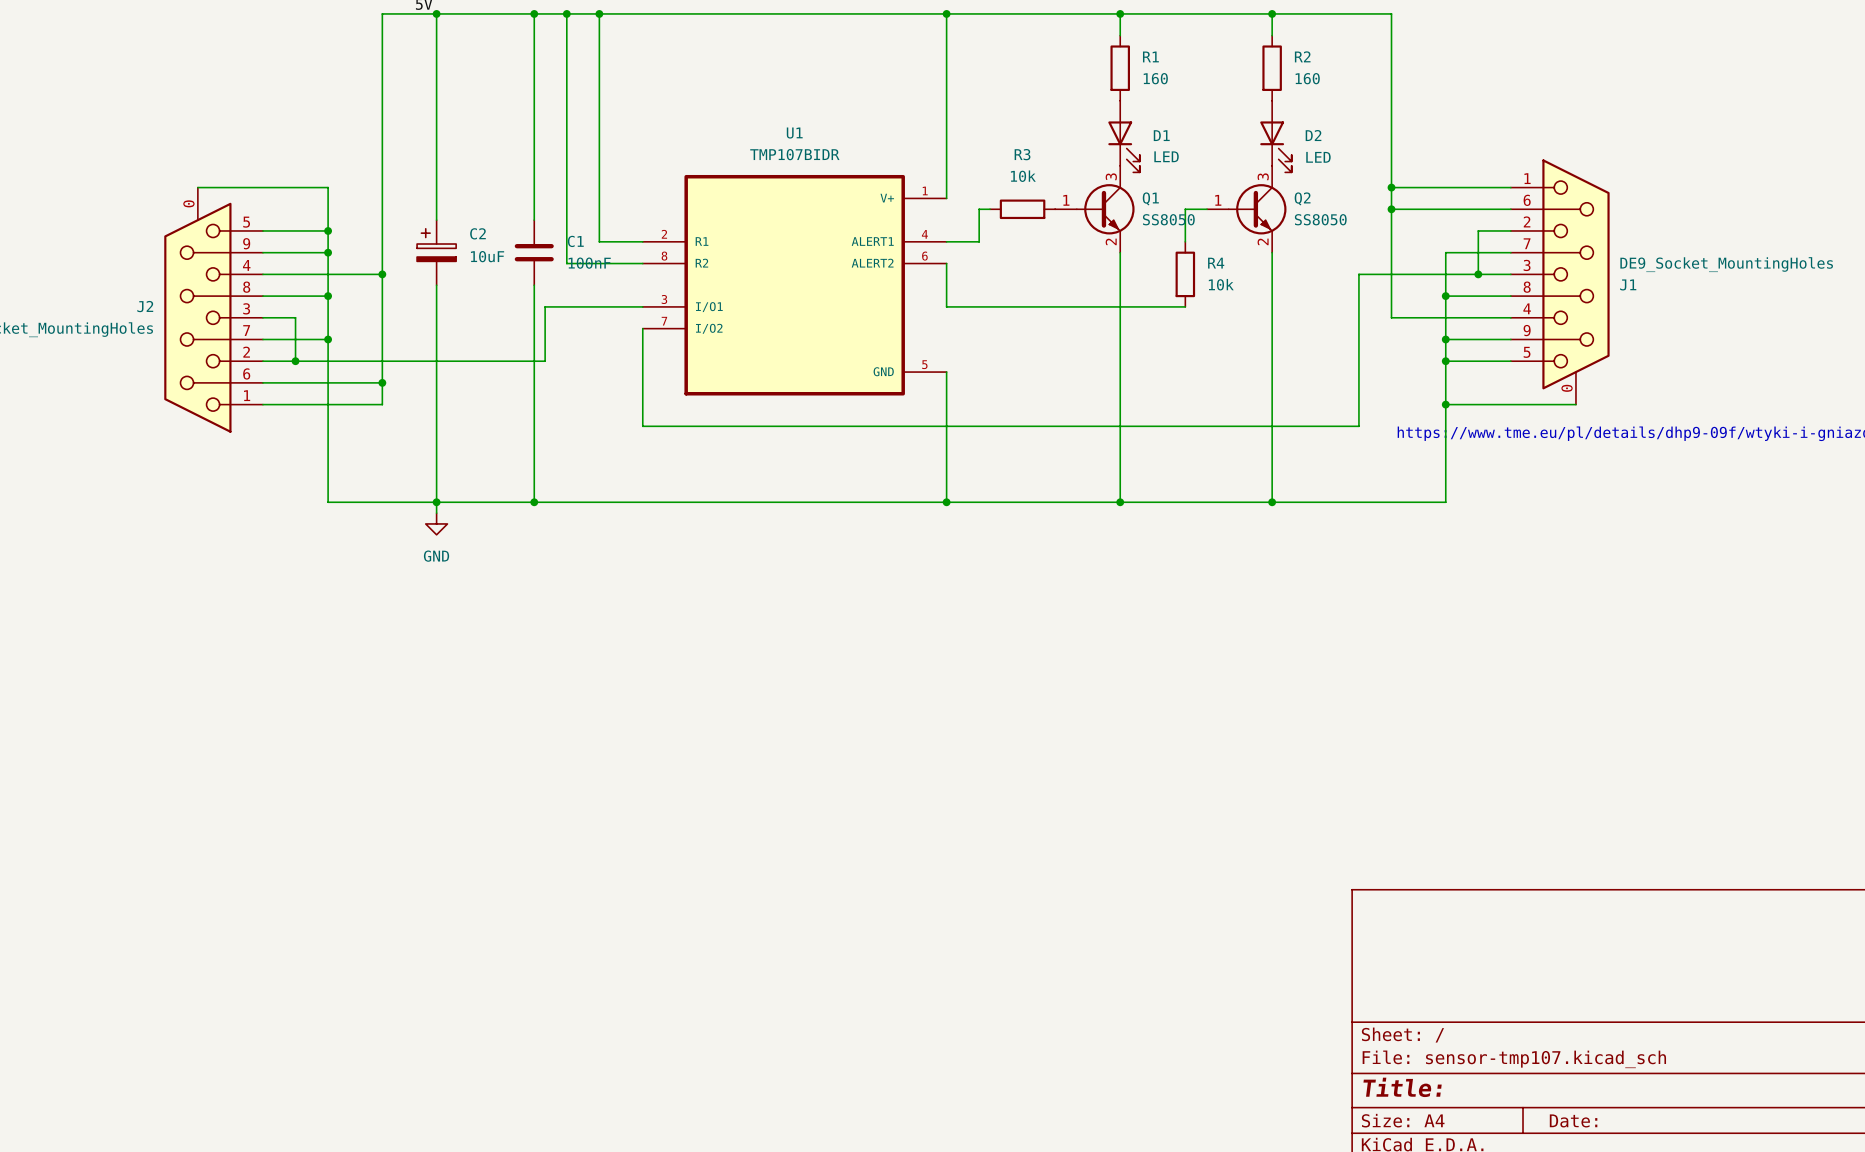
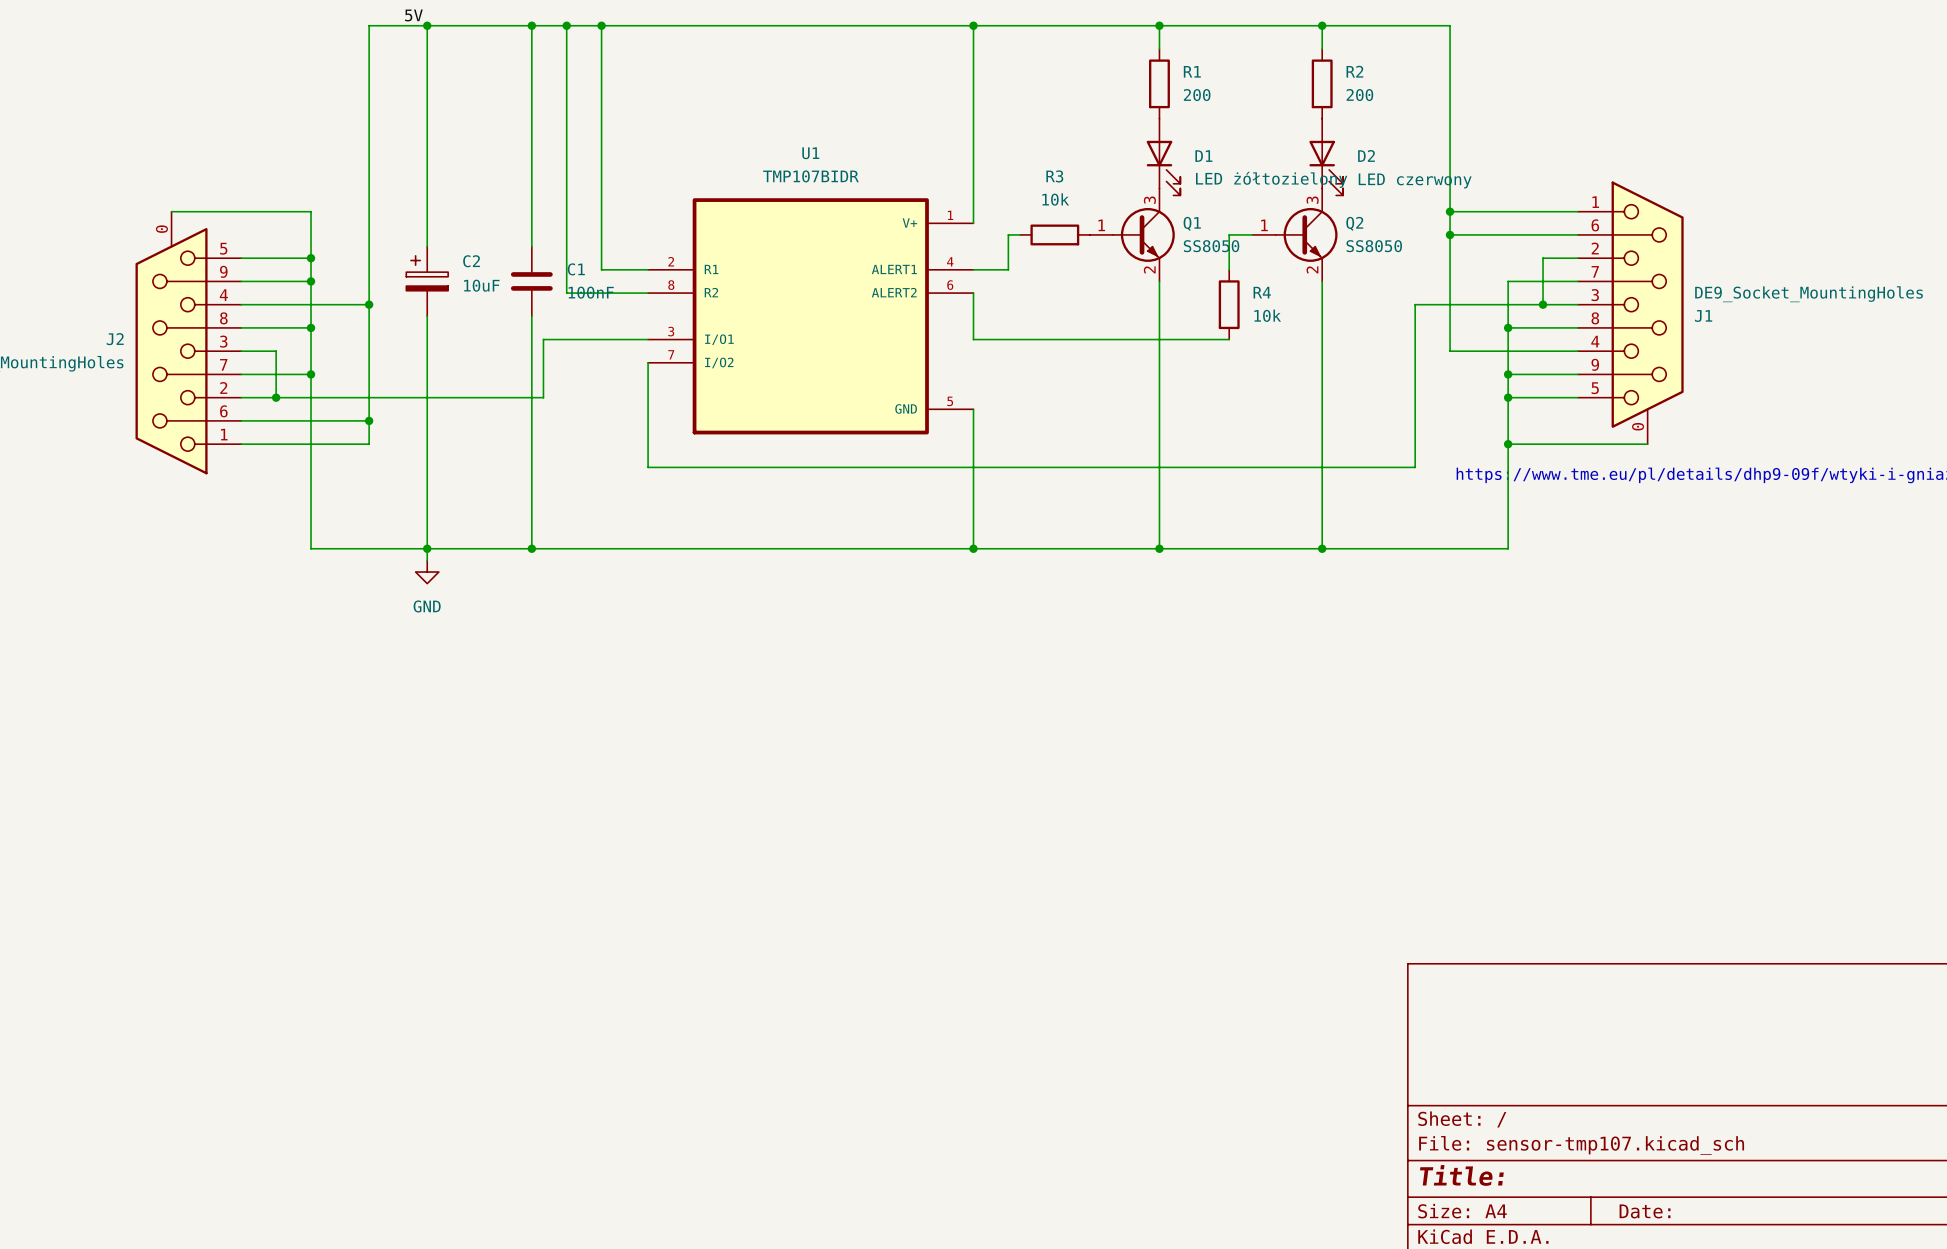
R1 value: 160 (1155, 78) -> 200 (1197, 95)
R2 value: 160 (1307, 78) -> 200 (1359, 95)
D1 value: LED (1166, 156) -> LED żółtozielony (1271, 179)
D2 value: LED (1318, 157) -> LED czerwony (1415, 180)

